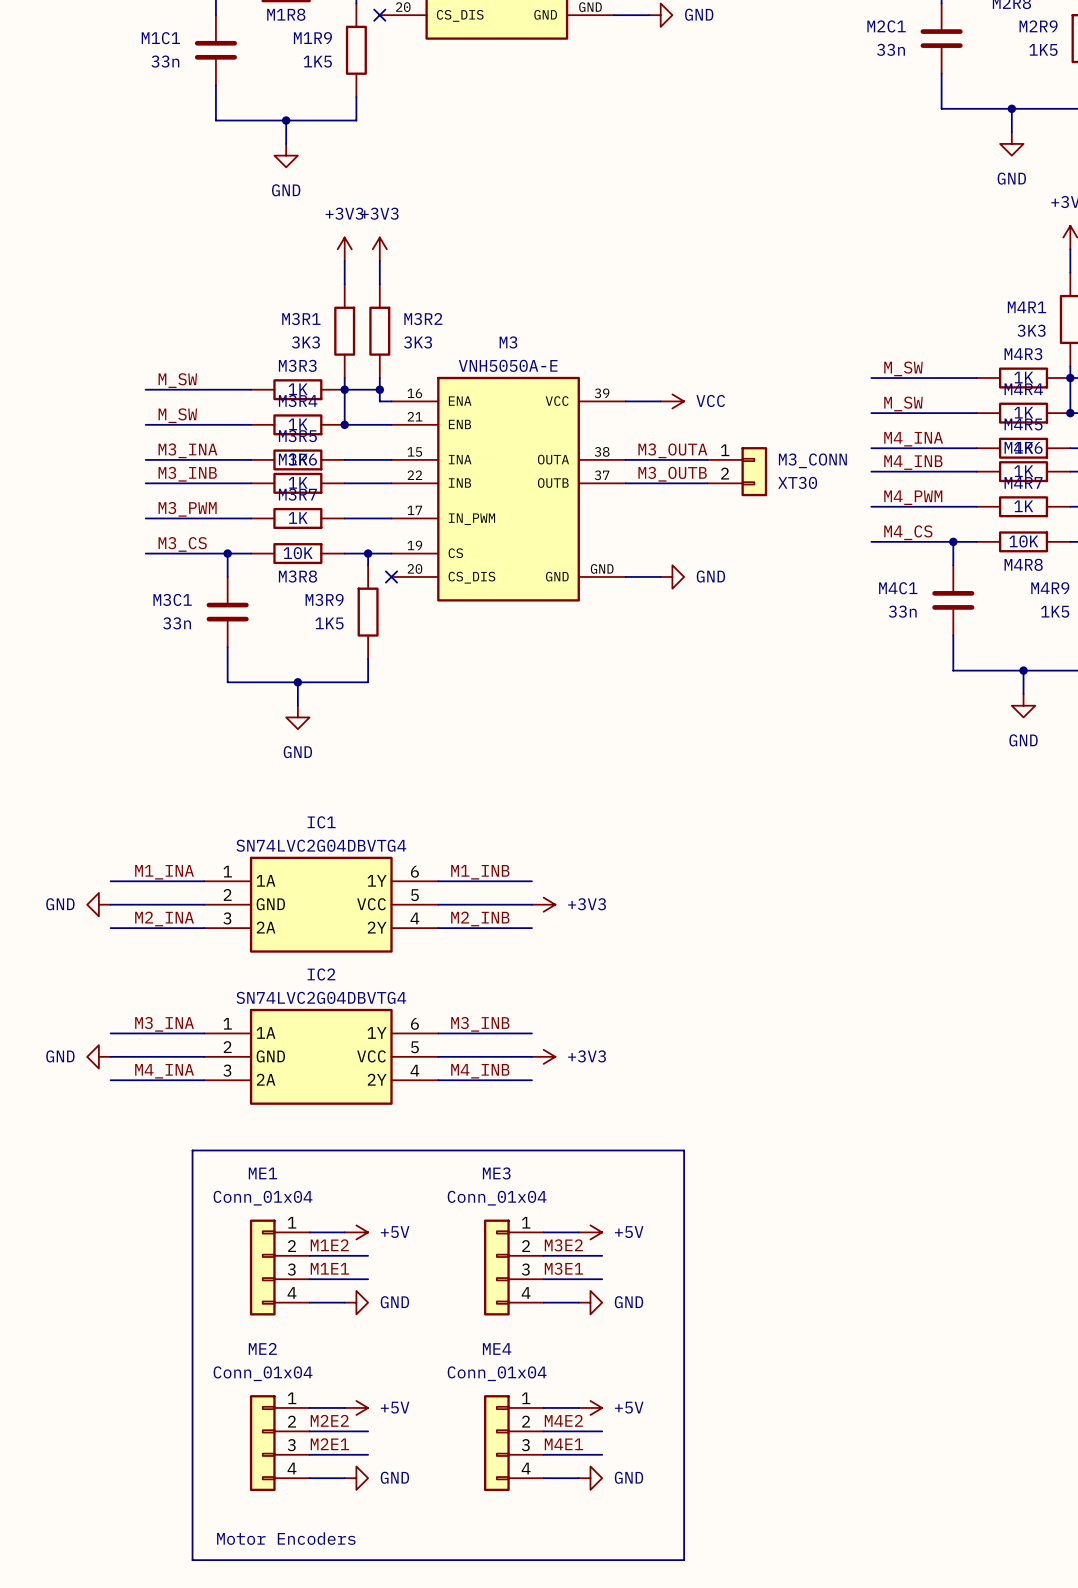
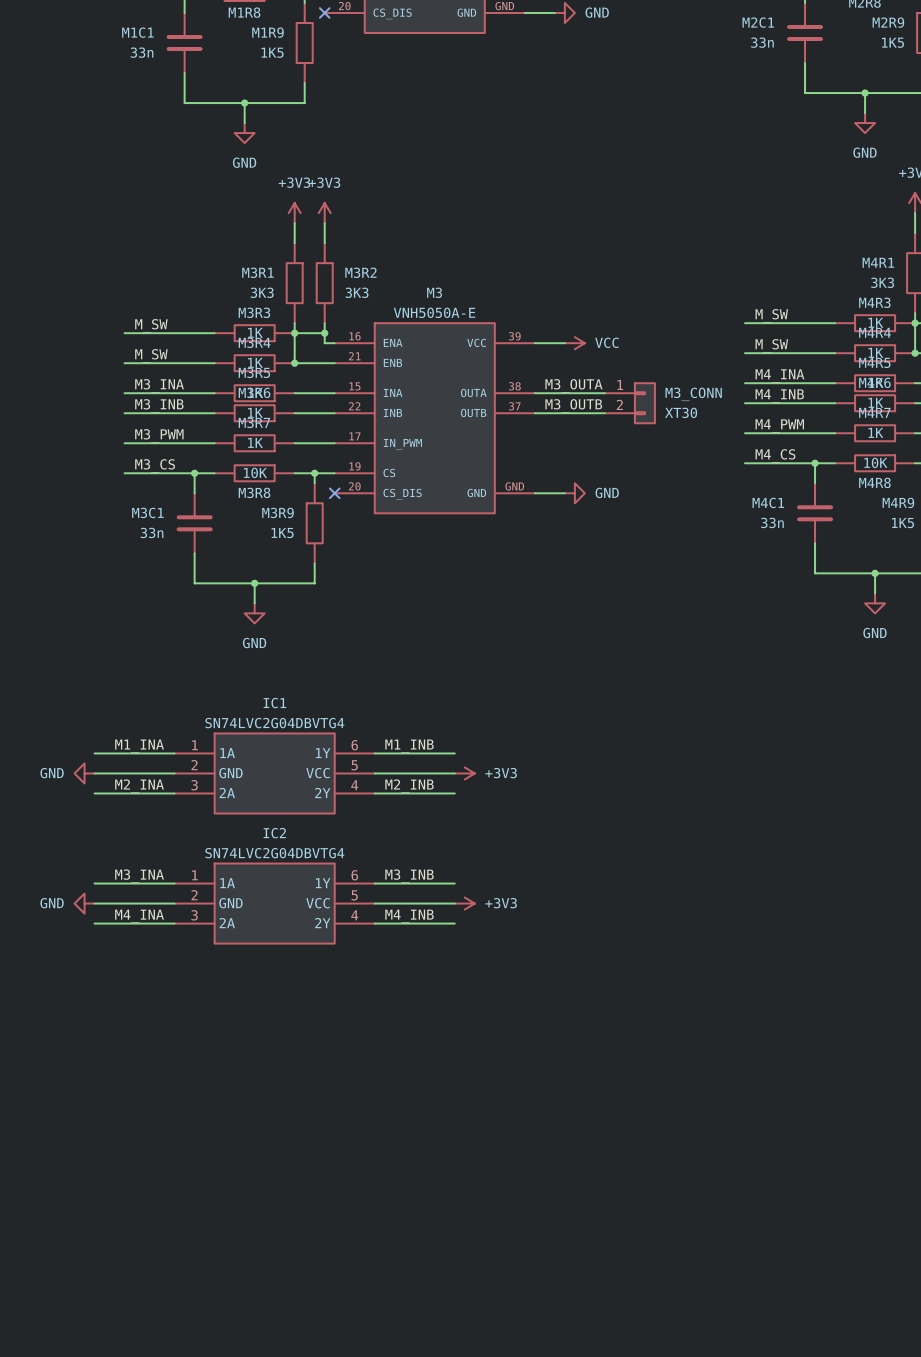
line: (192, 1150) (684, 1150) (684, 1560) (192, 1560) (192, 1150) -> none
wire: (309, 1232) (344, 1232) -> none
power symbol: +5V (356, 1232) -> none
wire: (543, 1232) (578, 1232) -> none
power symbol: +5V (590, 1232) -> none
label: M1E2 (329, 1245) -> none
label: M3E2 (563, 1245) -> none
wire: (309, 1255) (368, 1255) -> none
wire: (543, 1255) (602, 1255) -> none
ME1: Conn_01x04 (279, 1267) -> none
ME3: Conn_01x04 (513, 1267) -> none
label: M1E1 (329, 1268) -> none
label: M3E1 (563, 1268) -> none
wire: (309, 1279) (368, 1279) -> none
wire: (543, 1279) (602, 1279) -> none
wire: (309, 1302) (344, 1302) -> none
power symbol: GND (356, 1302) -> none
wire: (543, 1302) (578, 1302) -> none
power symbol: GND (590, 1302) -> none
wire: (309, 1407) (344, 1407) -> none
power symbol: +5V (356, 1407) -> none
wire: (543, 1407) (578, 1407) -> none
power symbol: +5V (590, 1407) -> none
label: M2E2 (329, 1420) -> none
label: M4E2 (563, 1420) -> none
wire: (309, 1431) (368, 1431) -> none
wire: (543, 1431) (602, 1431) -> none
ME2: Conn_01x04 (279, 1443) -> none
ME4: Conn_01x04 (513, 1443) -> none
label: M2E1 (329, 1444) -> none
label: M4E1 (563, 1444) -> none
wire: (309, 1454) (368, 1454) -> none
wire: (543, 1454) (602, 1454) -> none
wire: (309, 1478) (344, 1478) -> none
power symbol: GND (356, 1478) -> none
wire: (543, 1478) (578, 1478) -> none
power symbol: GND (590, 1478) -> none
text: Motor Encoders (286, 1538) -> none

